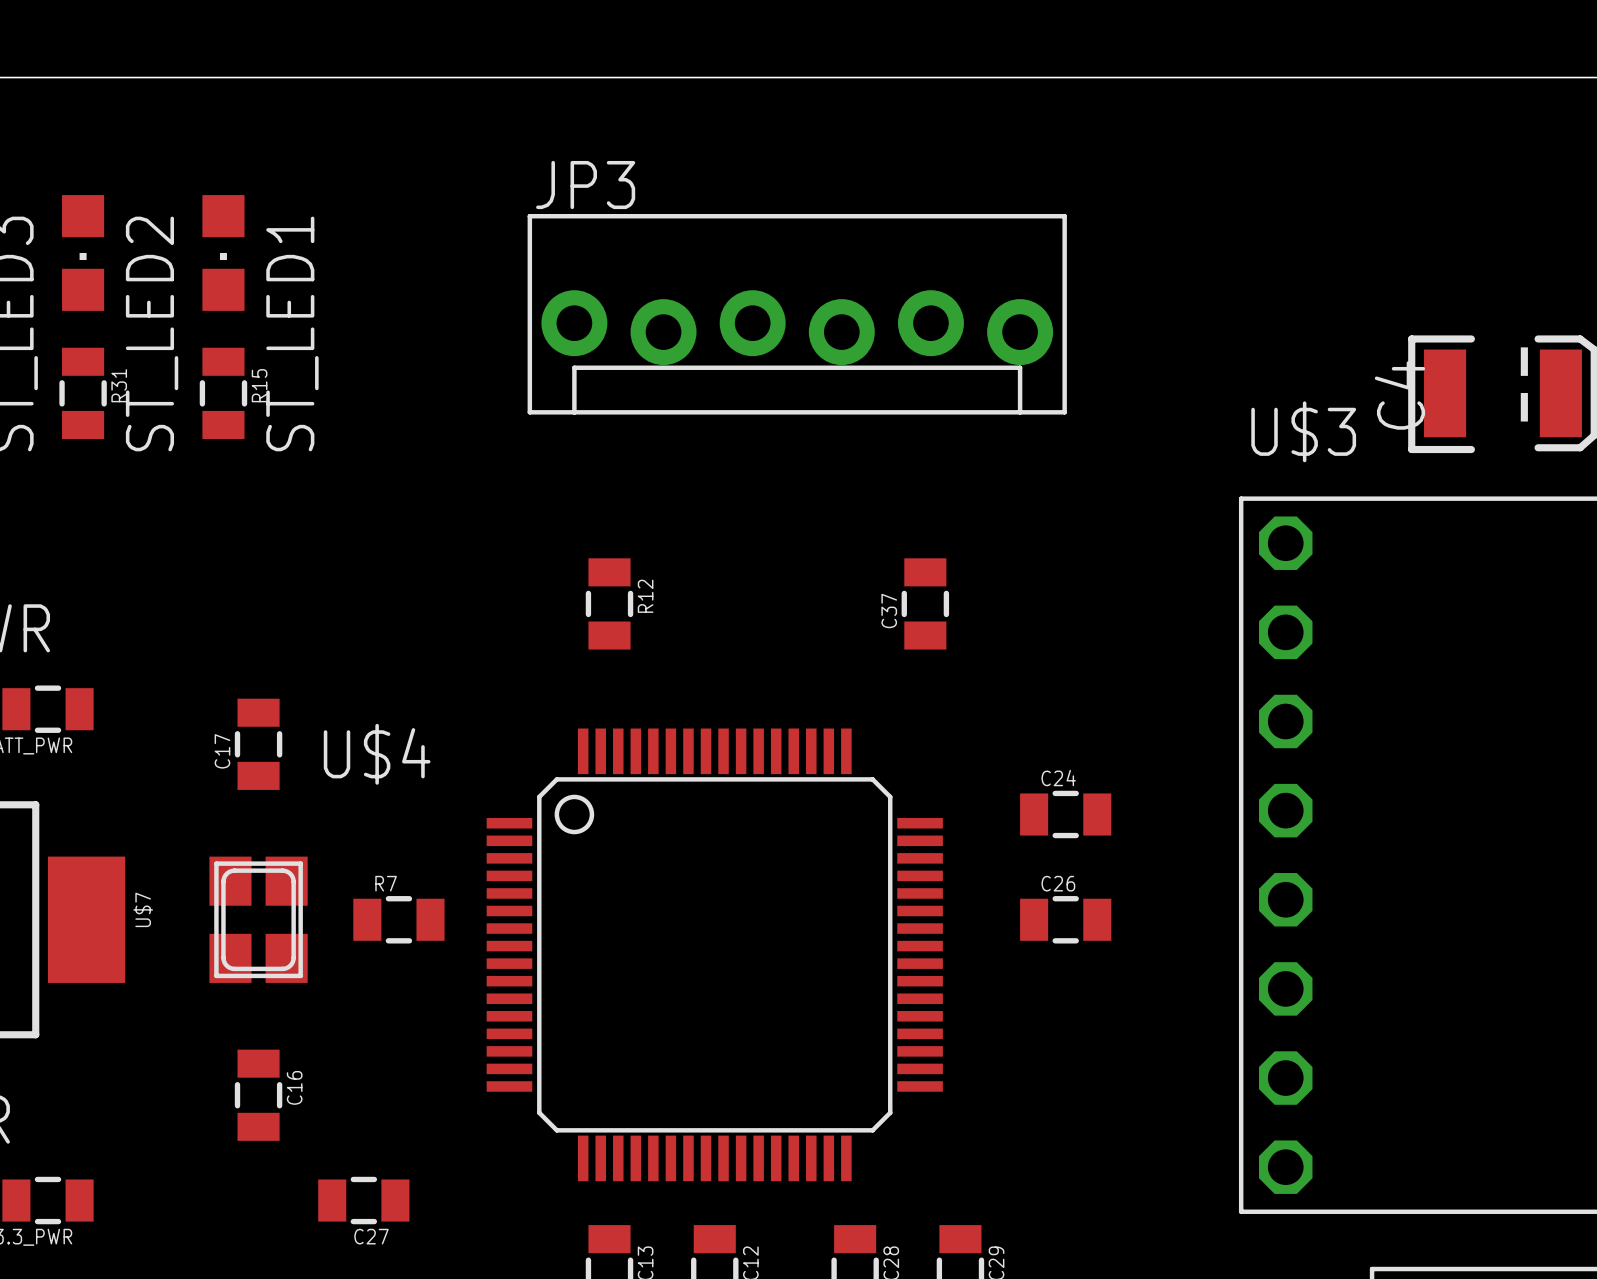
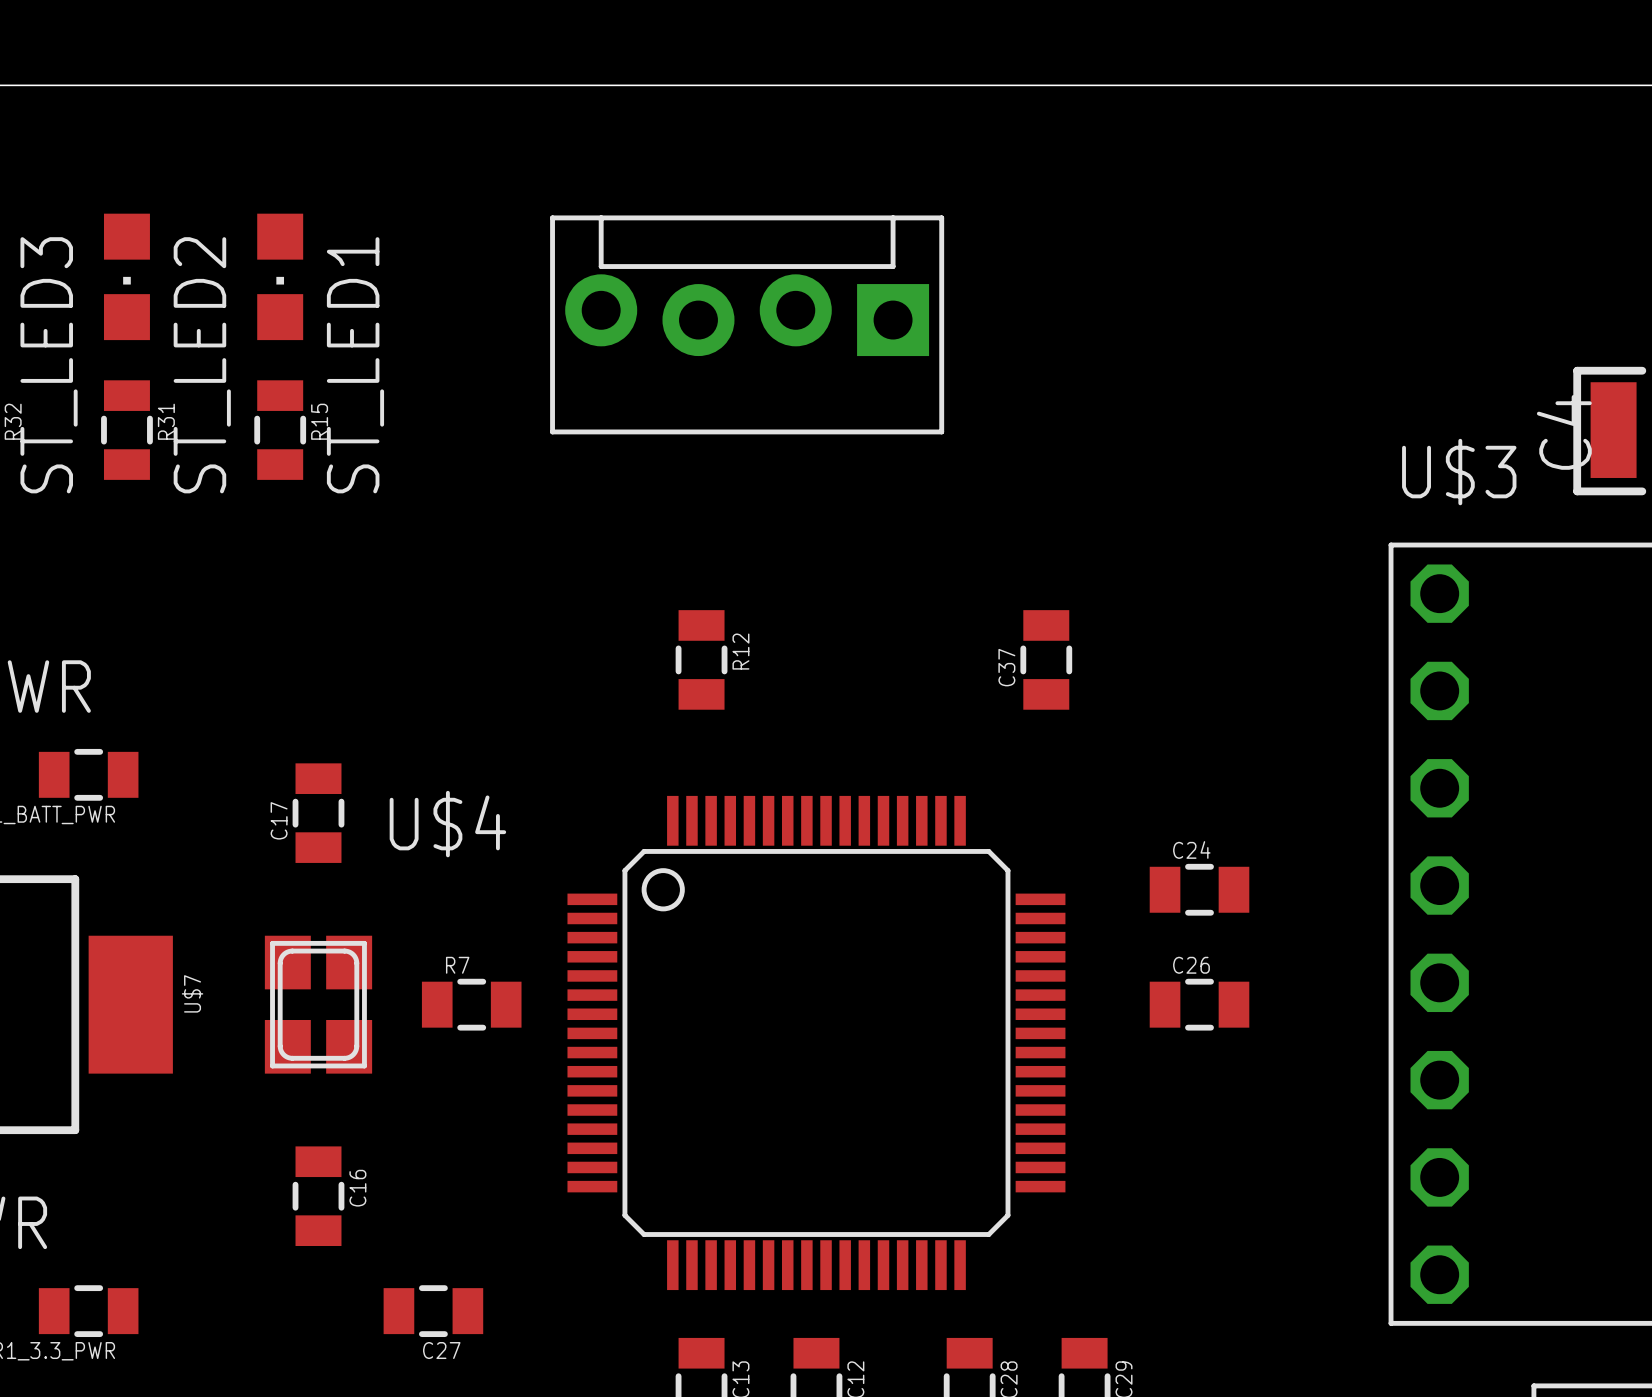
part: none -> (747, 324)
JP3: (797, 314) -> none

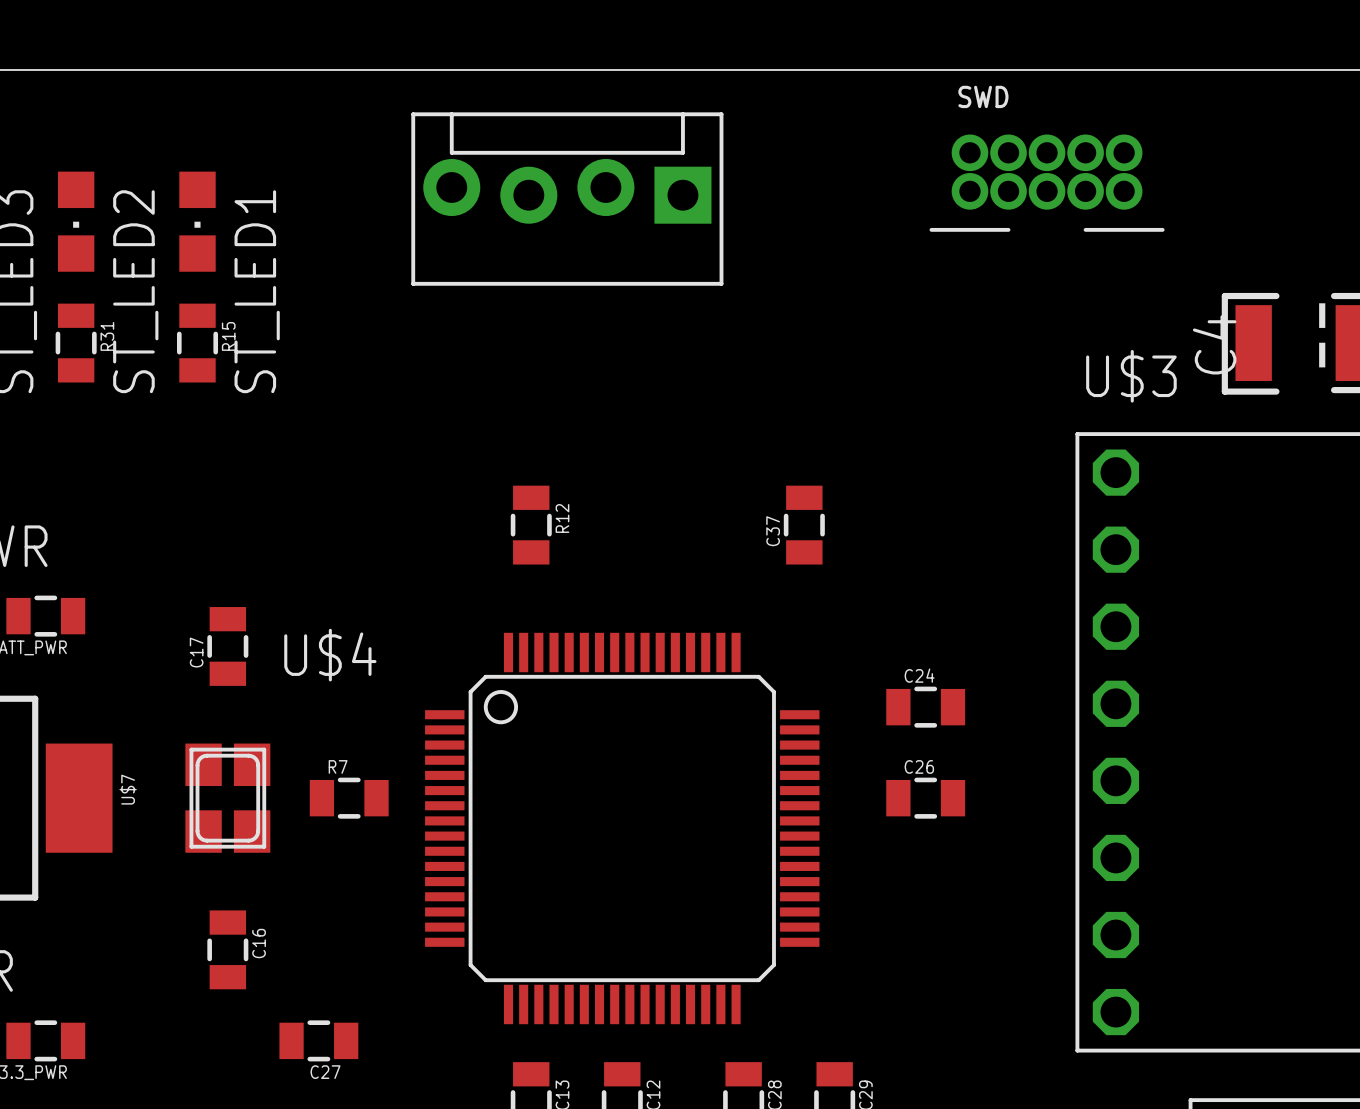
SWD: none -> (1047, 183)
part position: (747, 324) -> (567, 199)

